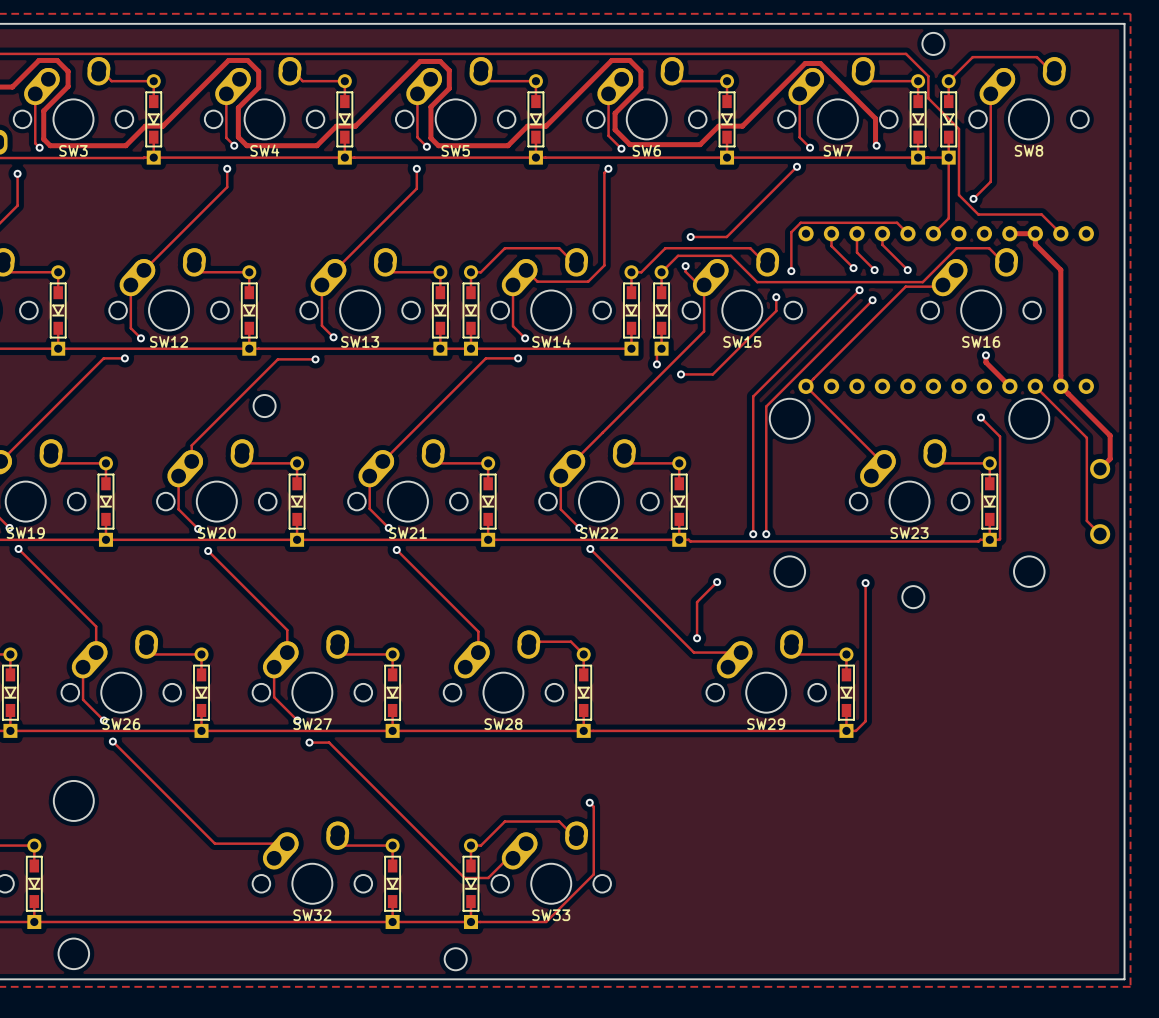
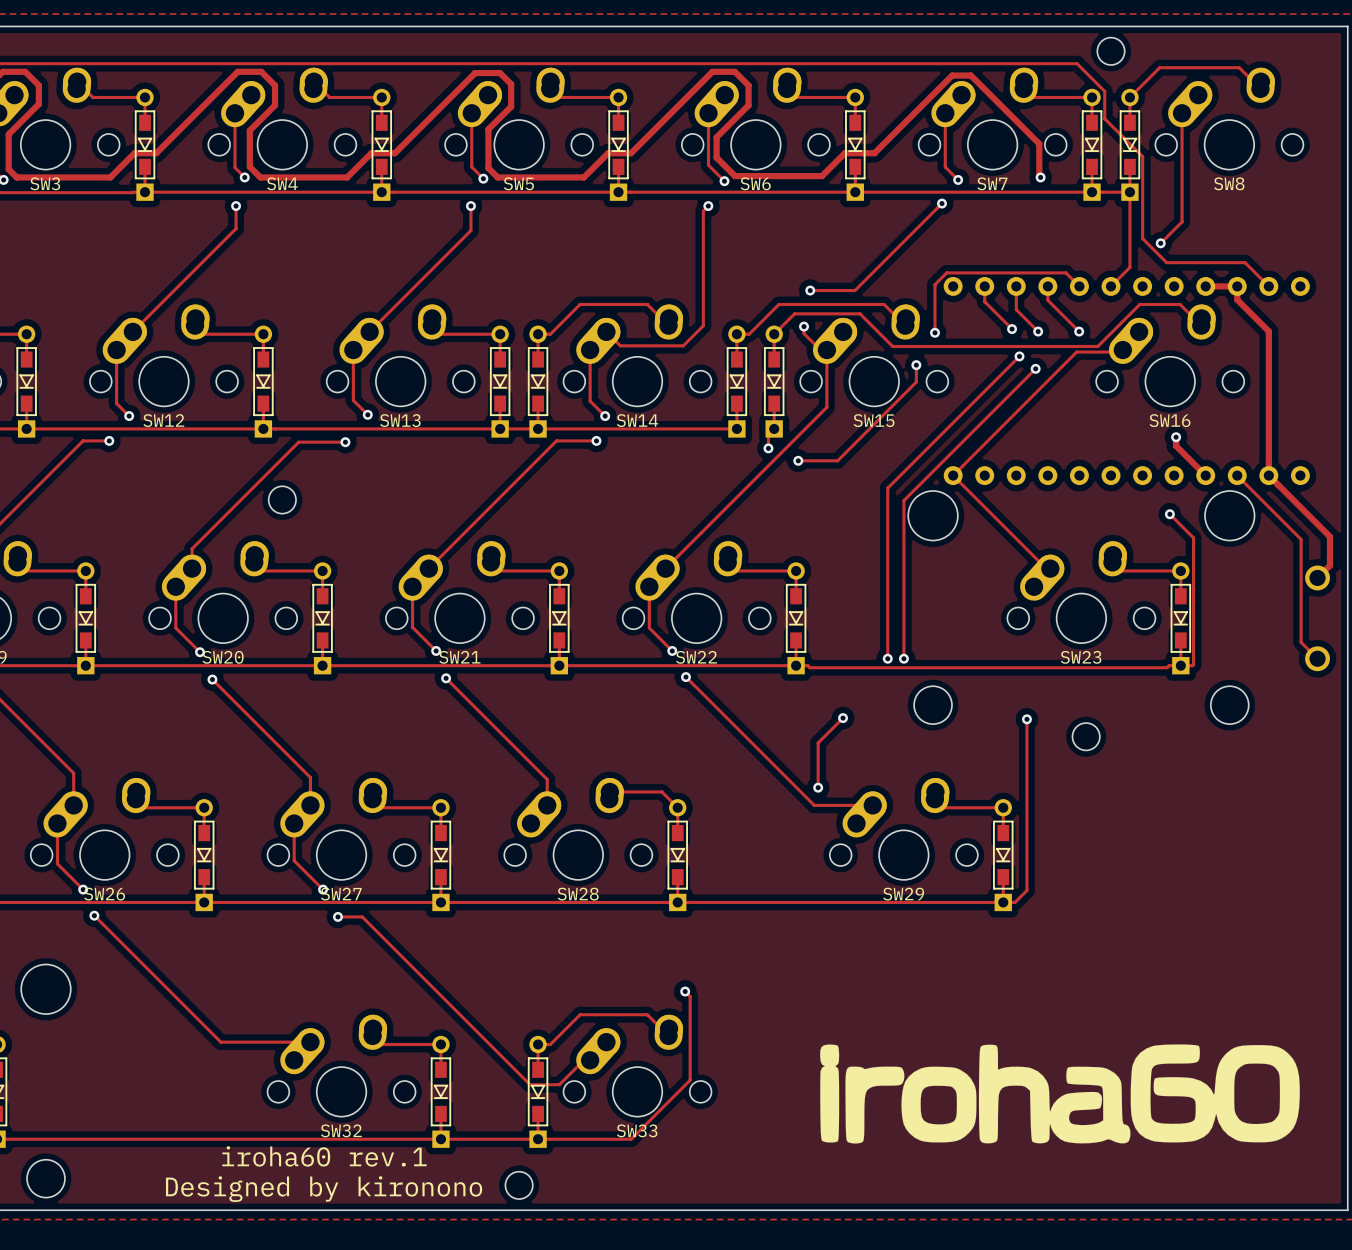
drawing: none -> [820, 1044, 1300, 1144]
text: none -> iroha60 rev.1 (324, 1156)
text: none -> Designed by kironono (324, 1189)

